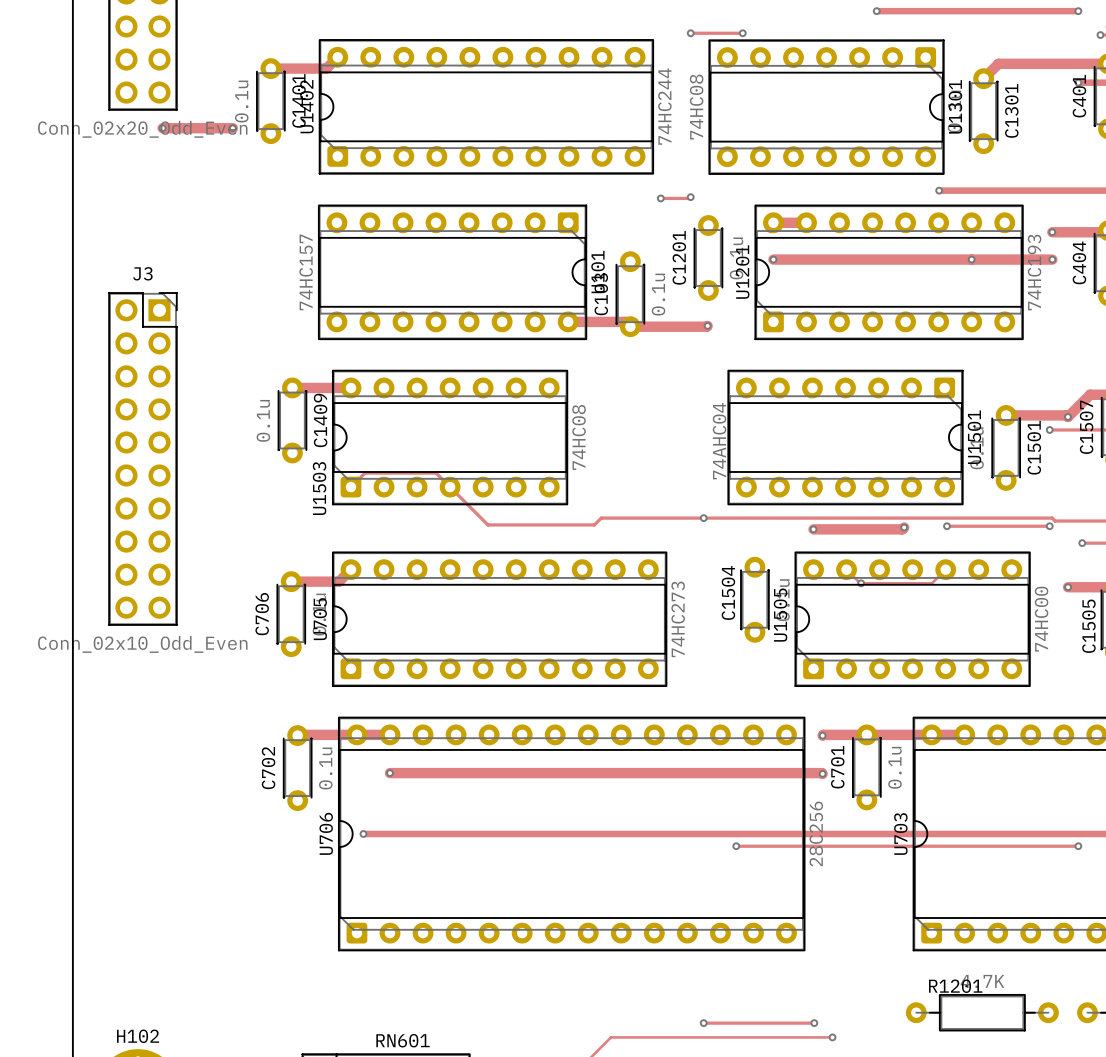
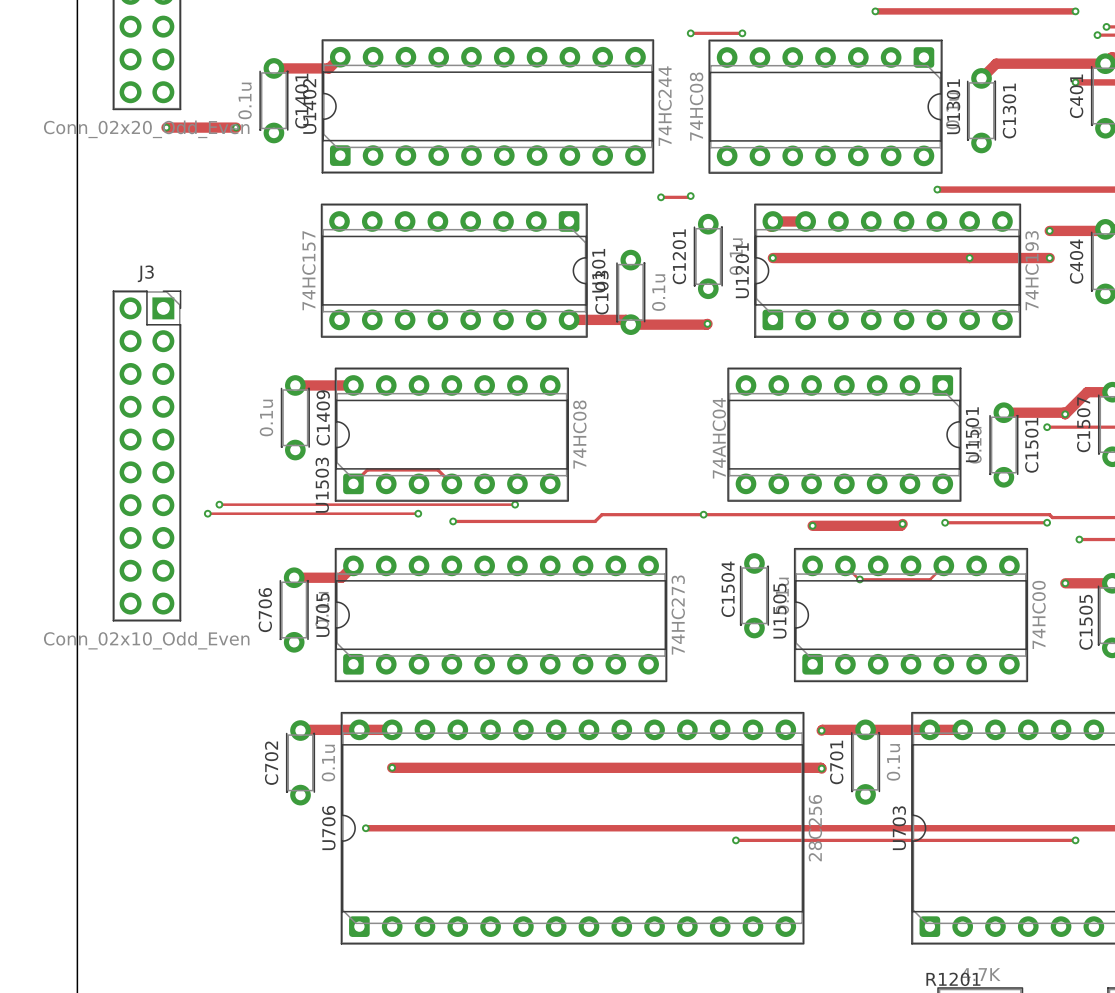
track: (450, 487) (487, 524) -> (453, 521) (489, 521)
track: none -> (219, 504) (515, 504)
via: none -> (219, 504)
via: none -> (515, 504)
track: none -> (207, 513) (418, 513)
via: none -> (207, 513)
via: none -> (418, 513)
via: none -> (453, 521)

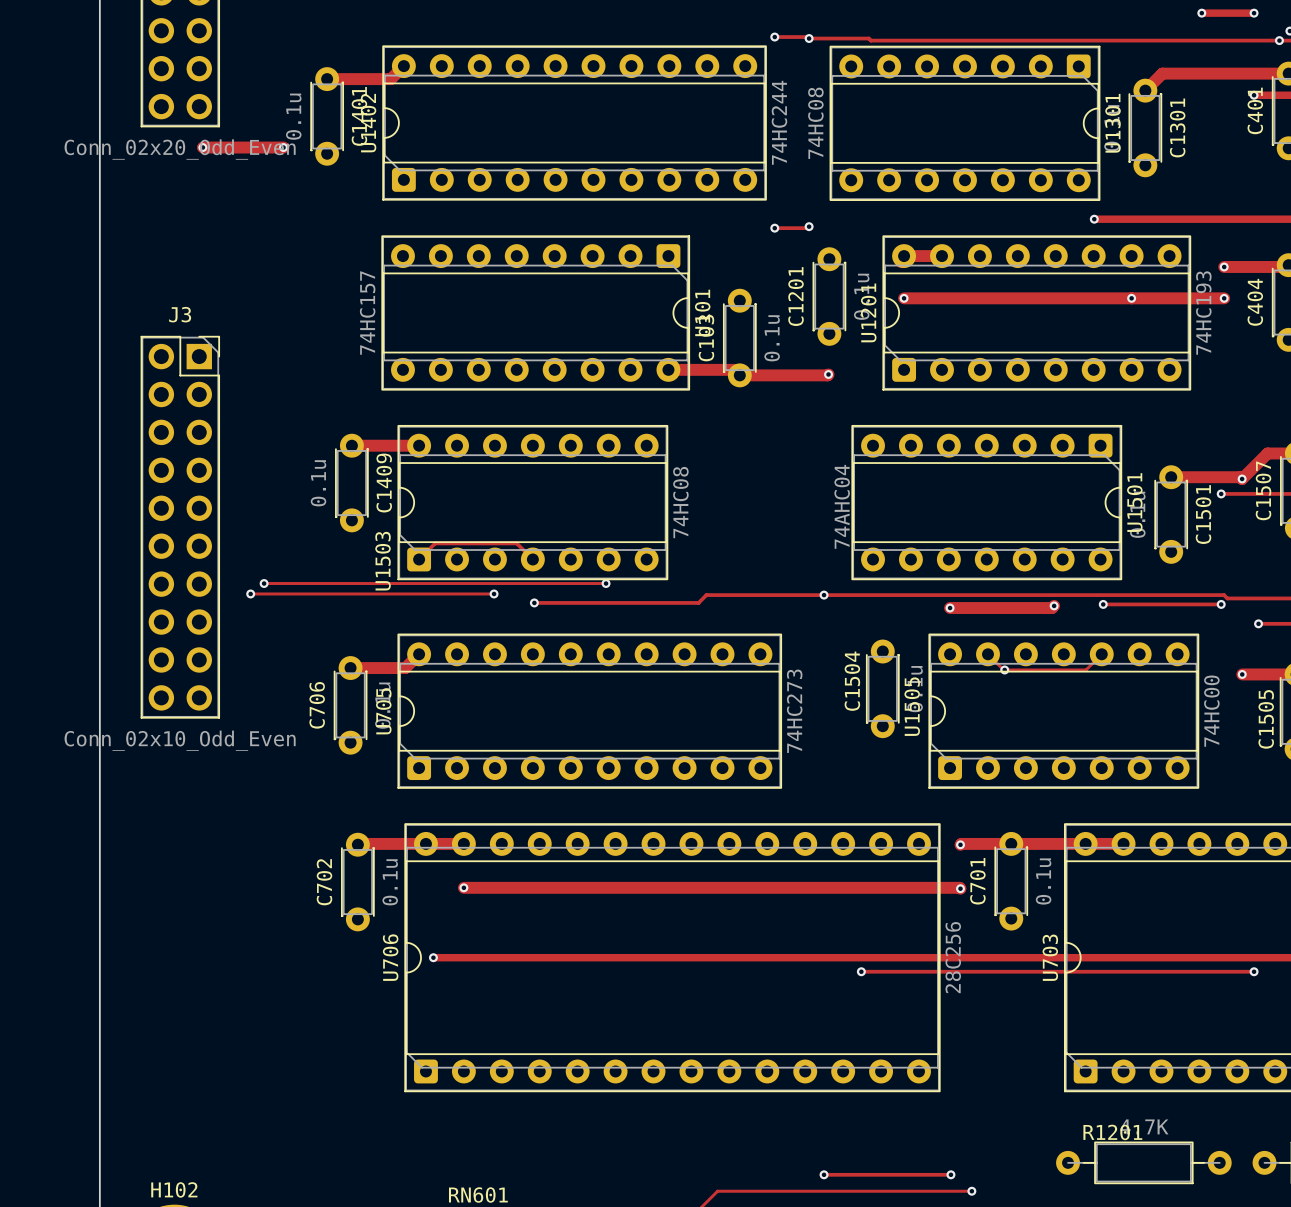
track: (875, 11) (1030, 11) -> none
via: (875, 11) -> none
via: none -> (1201, 13)
track: none -> (774, 37) (809, 38)
via: none -> (774, 37)
track: none -> (868, 38) (870, 40) (1279, 40)
via: (742, 33) -> none

